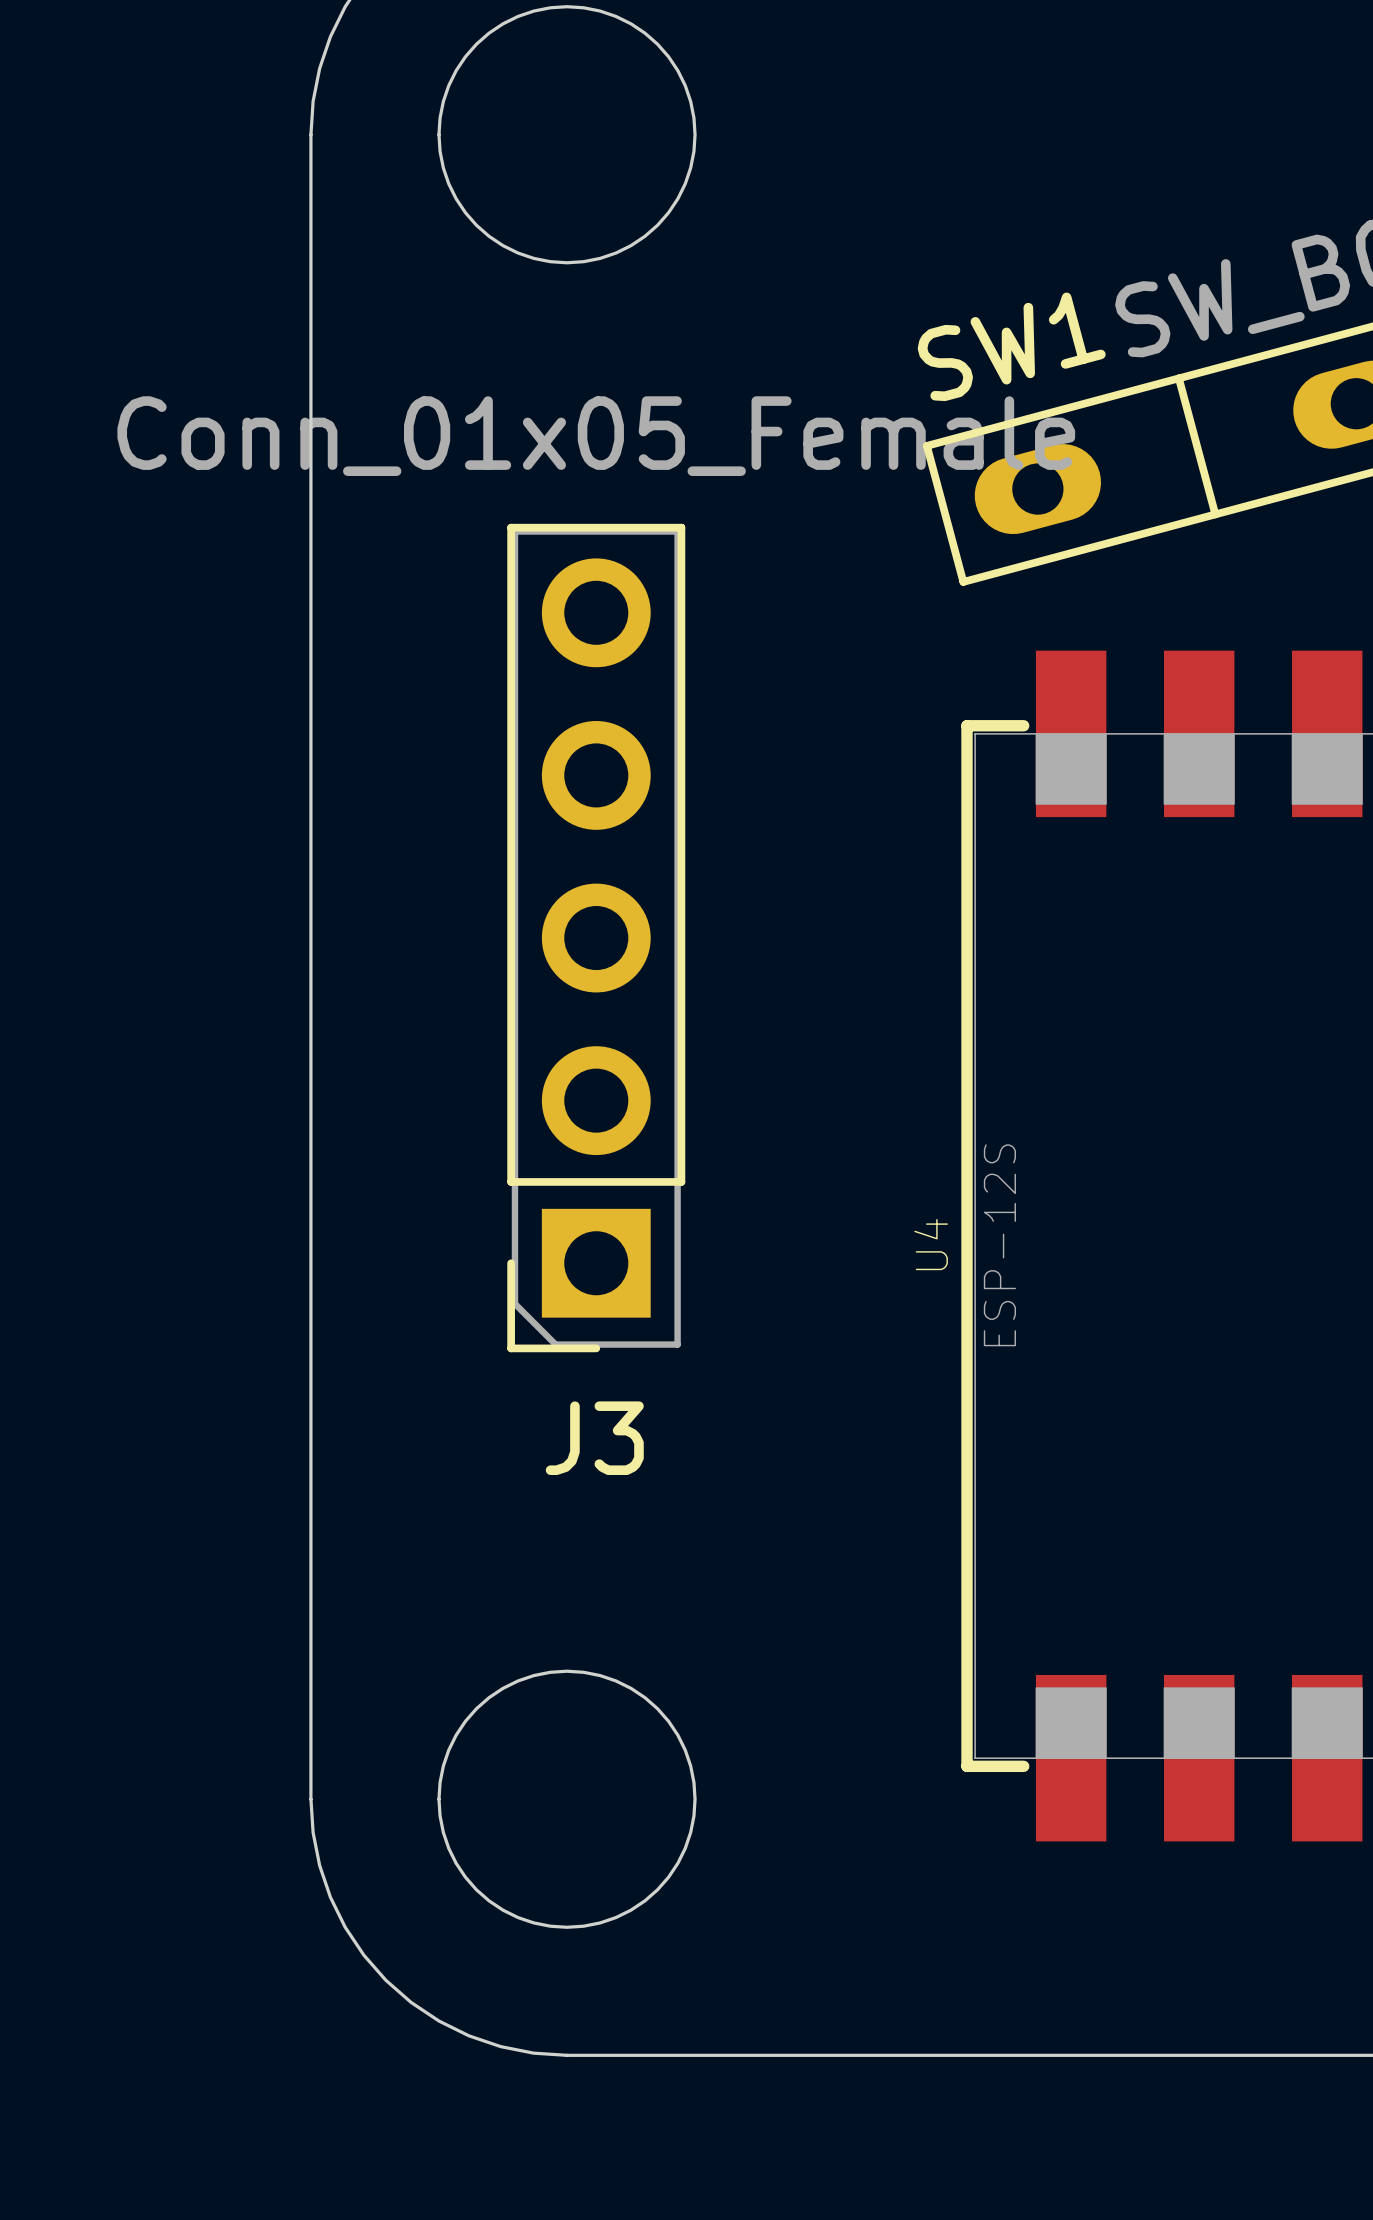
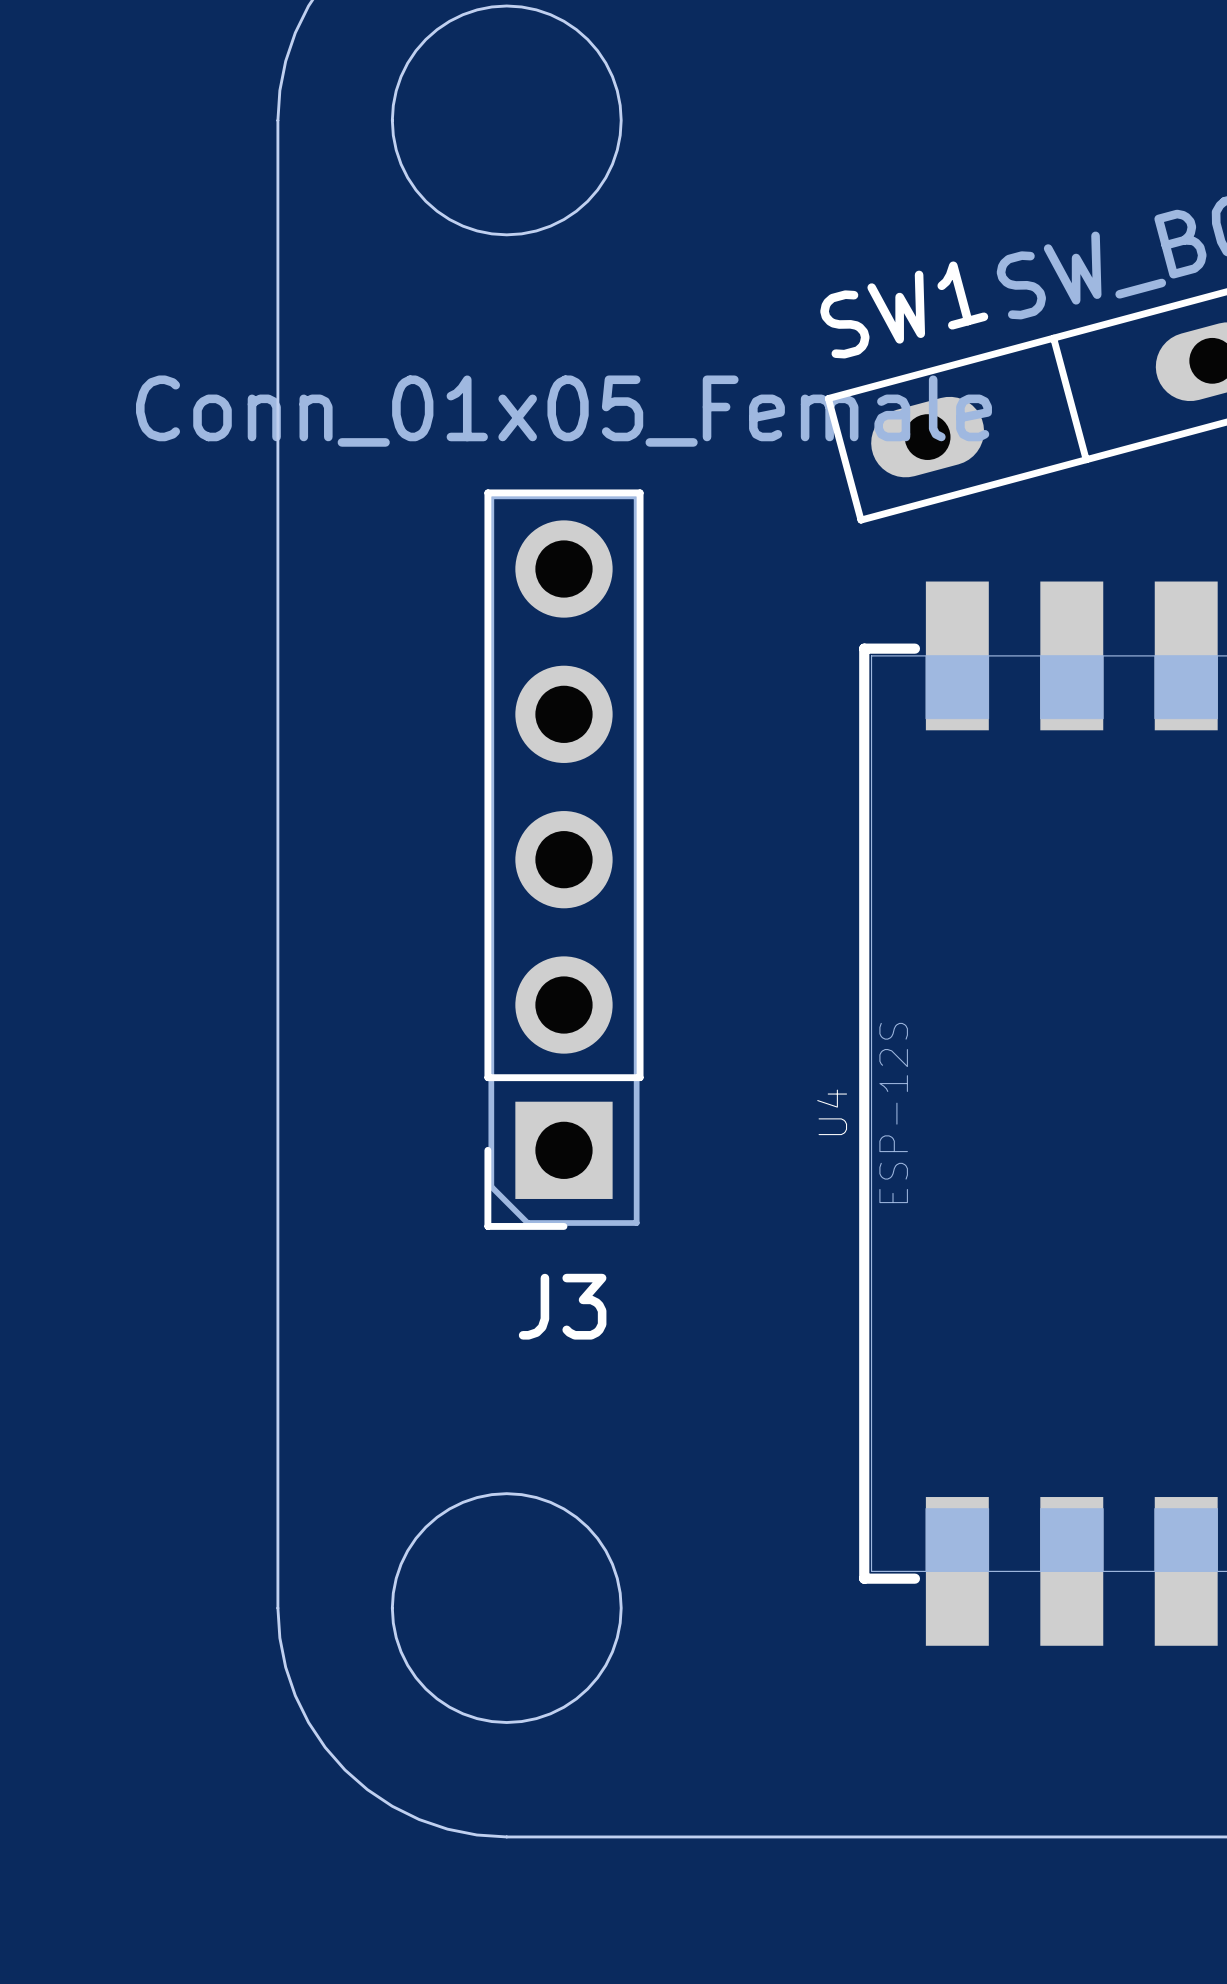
J3 position: (596, 938) -> (563, 859)

